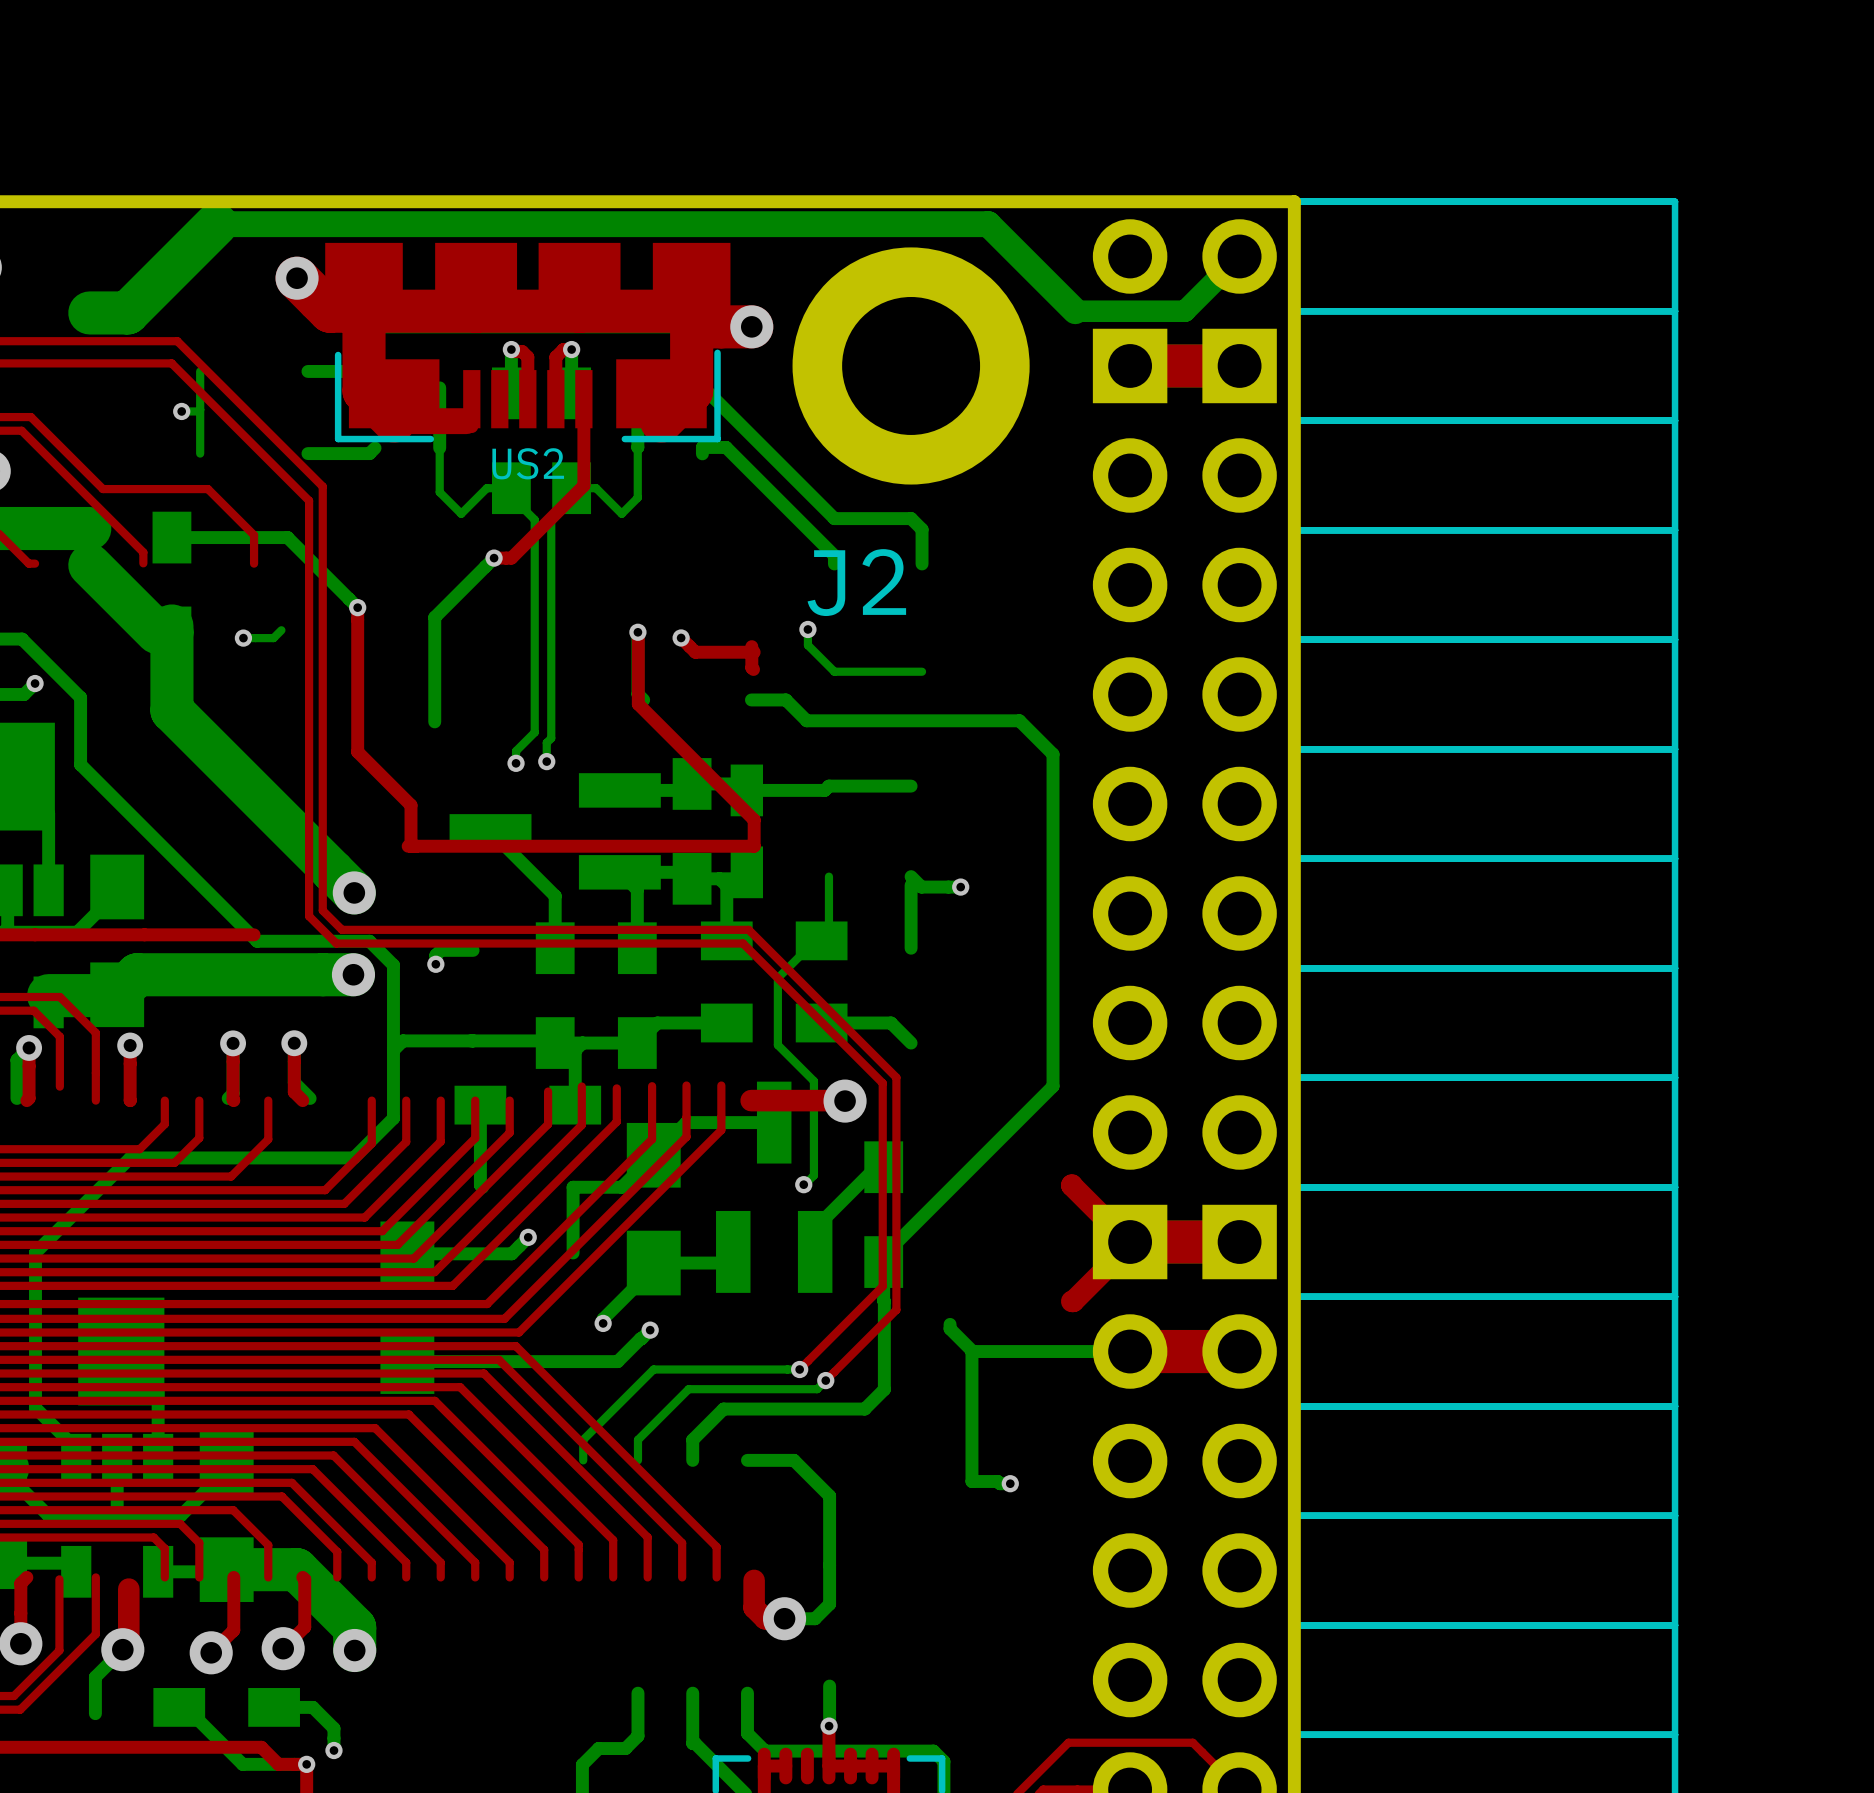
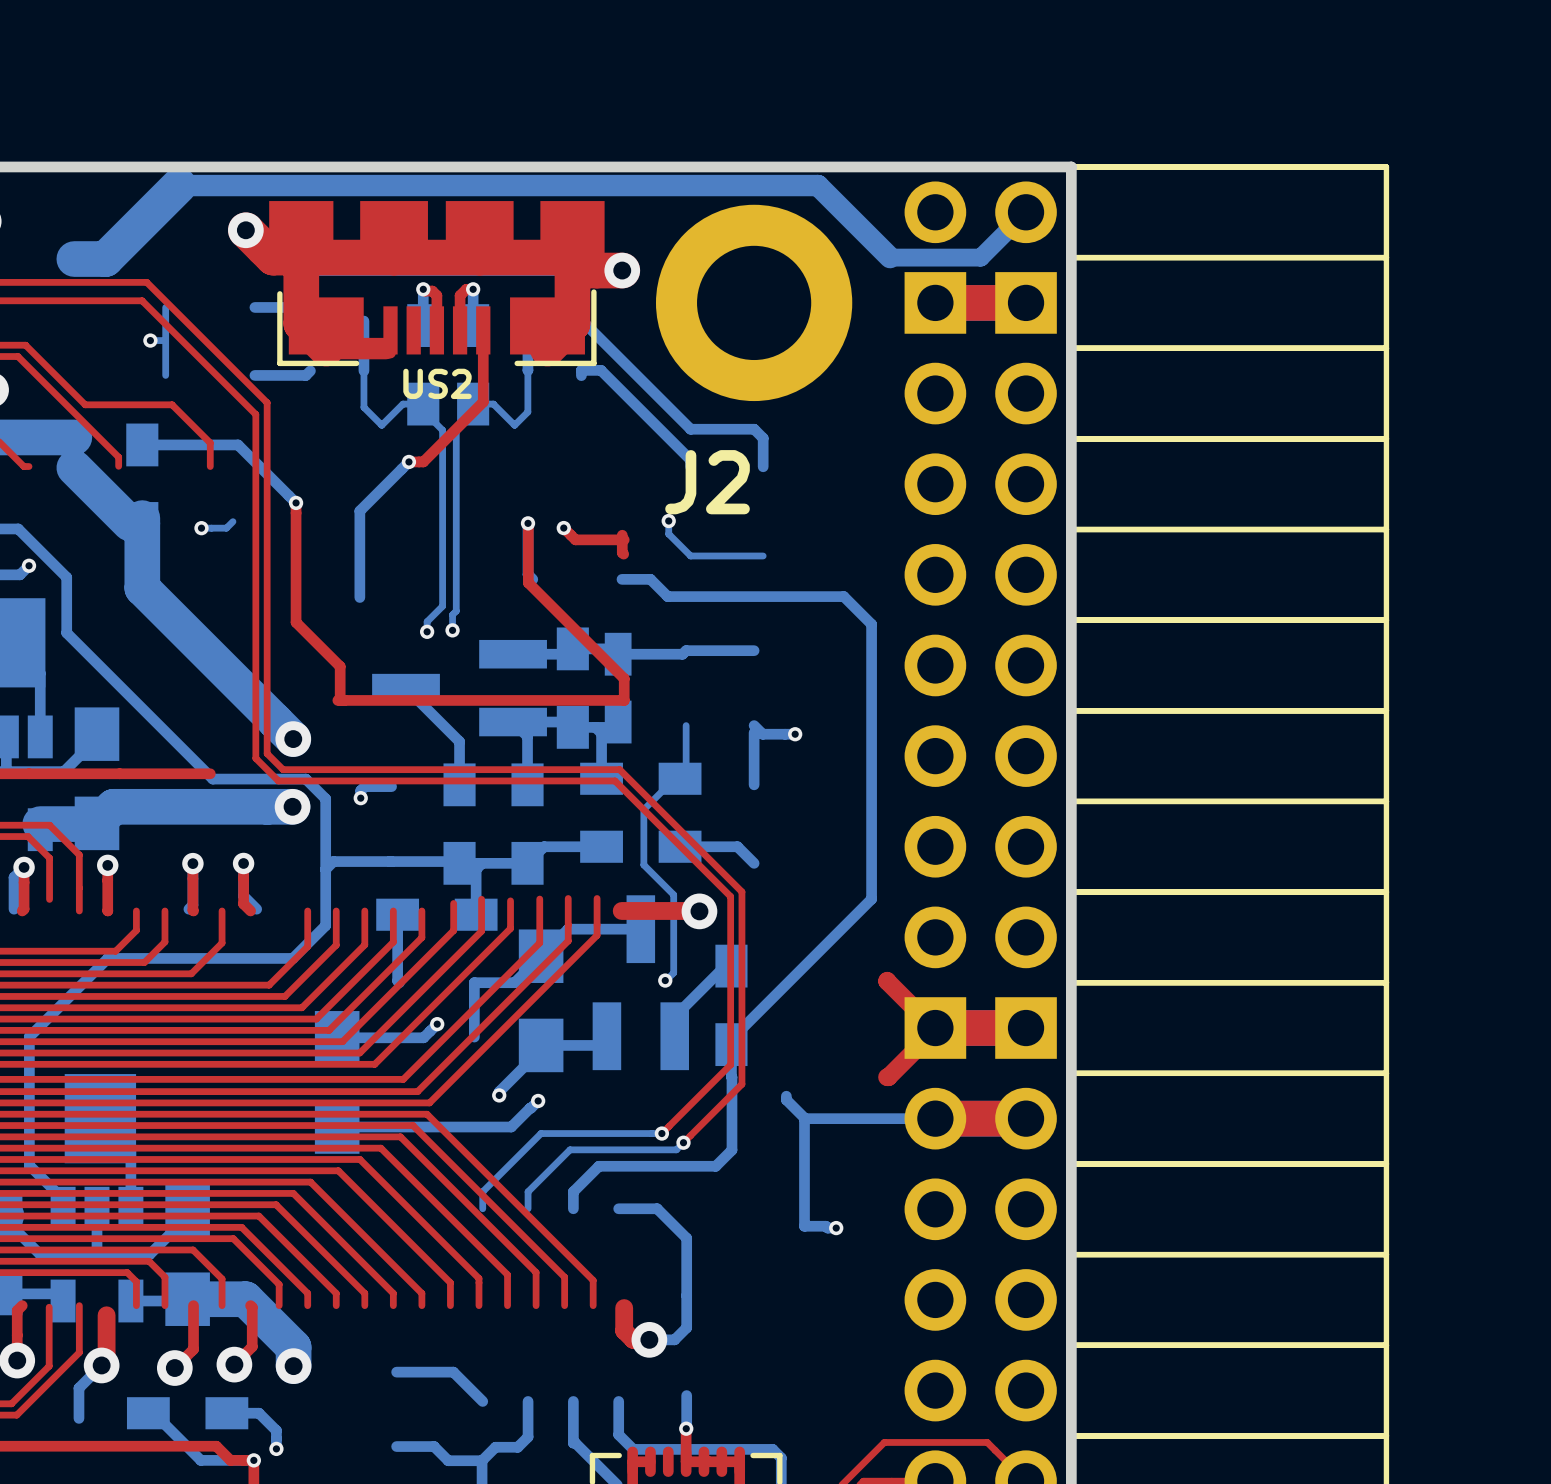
bottom track: none -> (396, 1372) (453, 1372) (482, 1401)
bottom track: none -> (396, 1446) (434, 1446) (448, 1460) (482, 1460)

